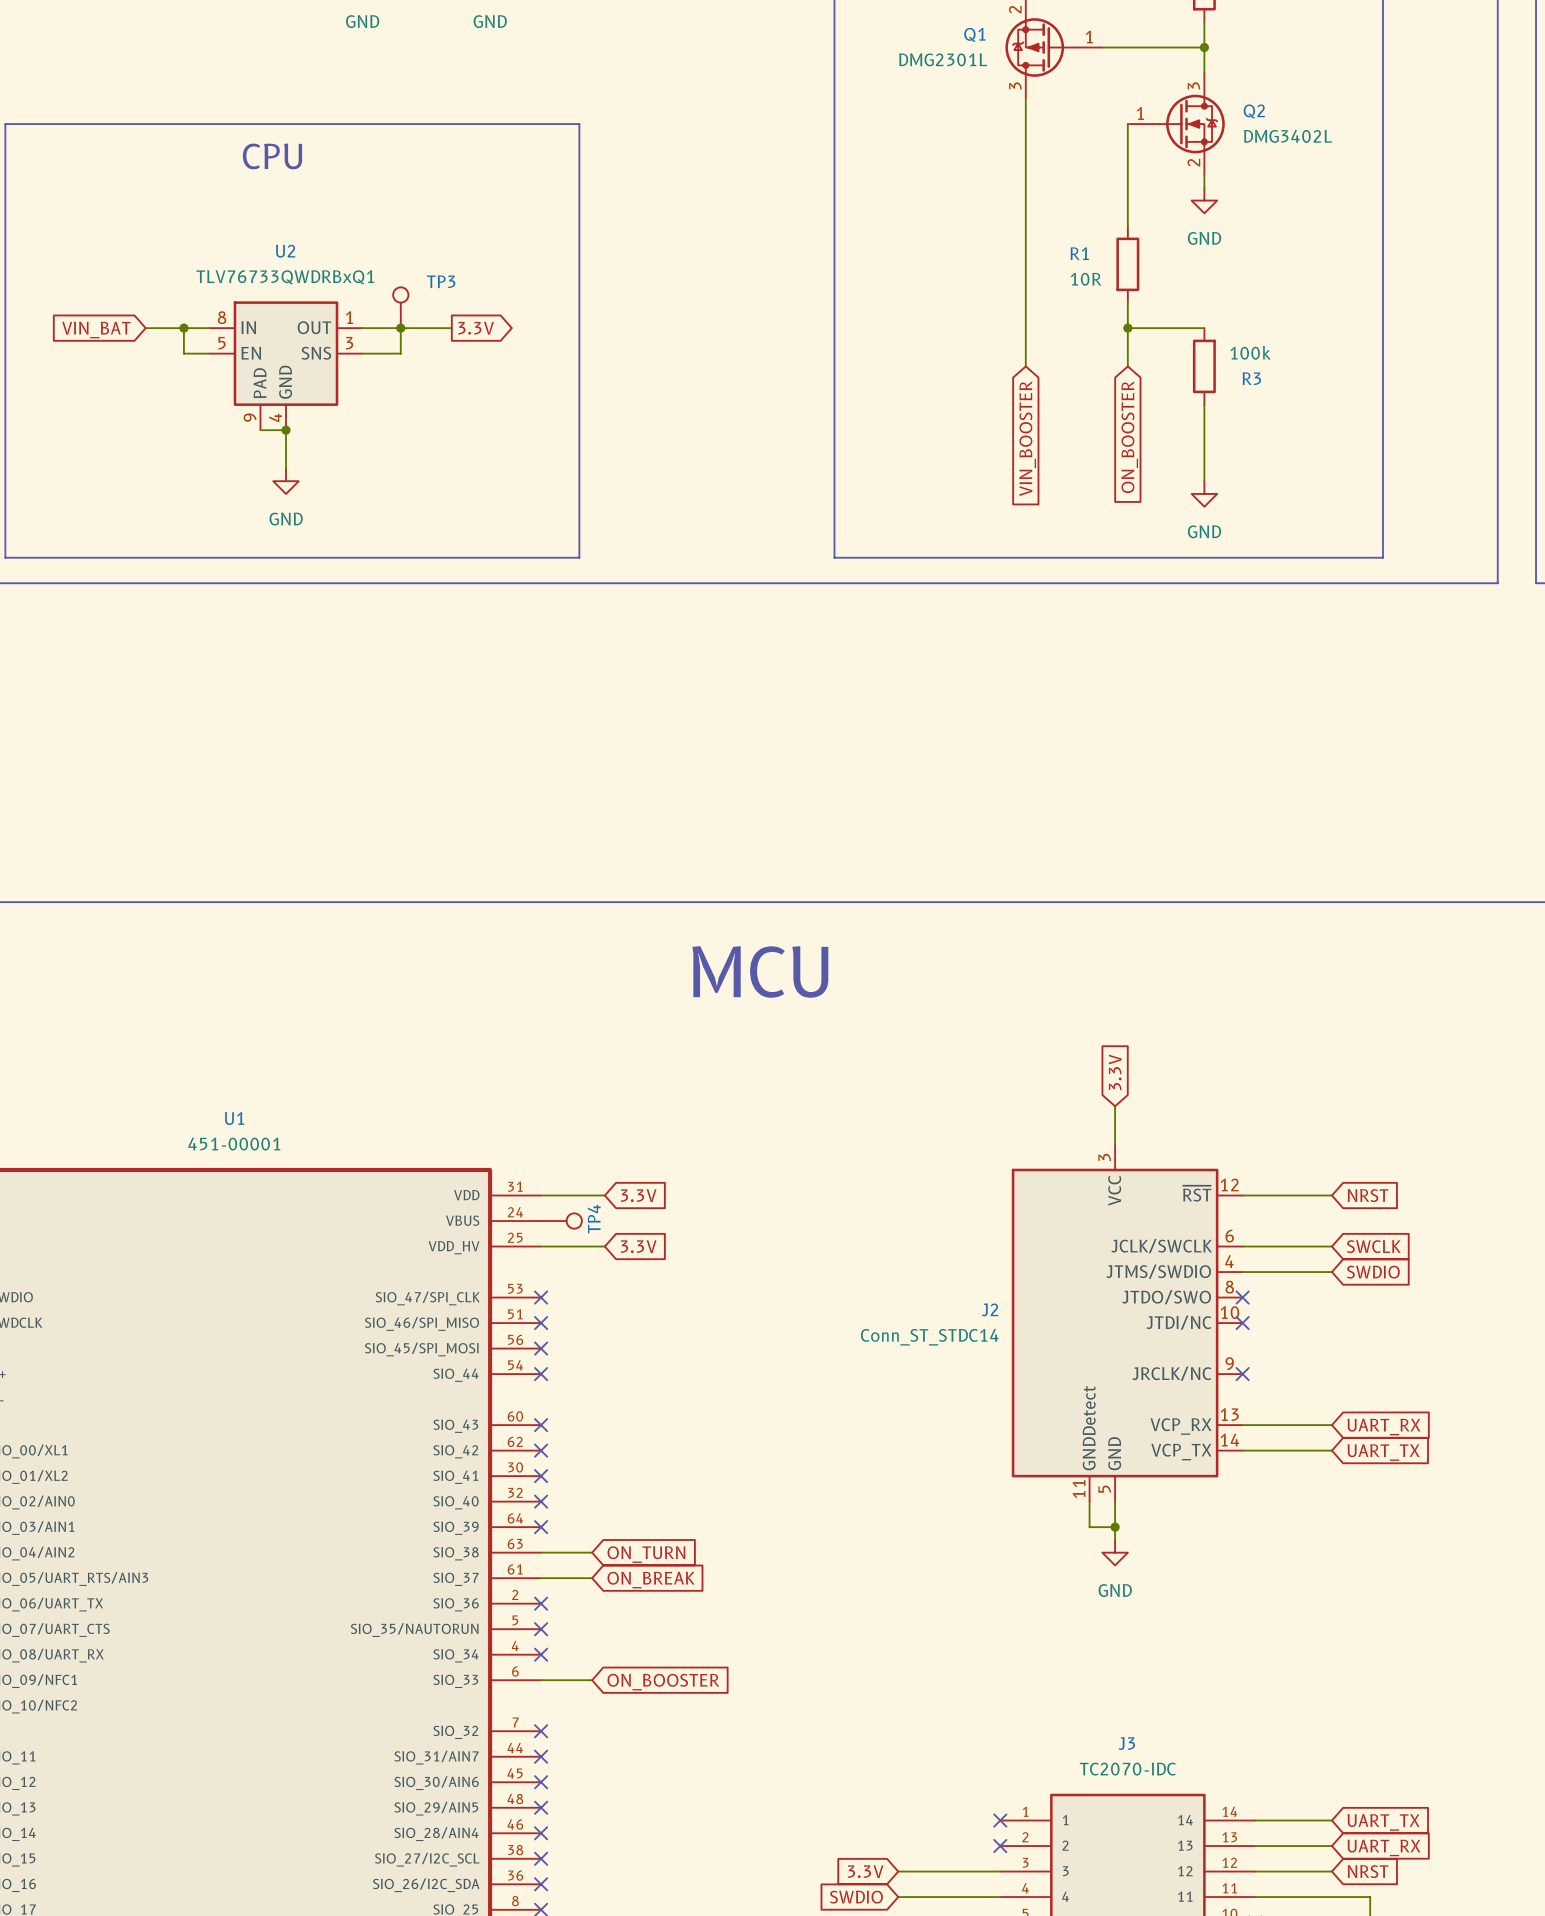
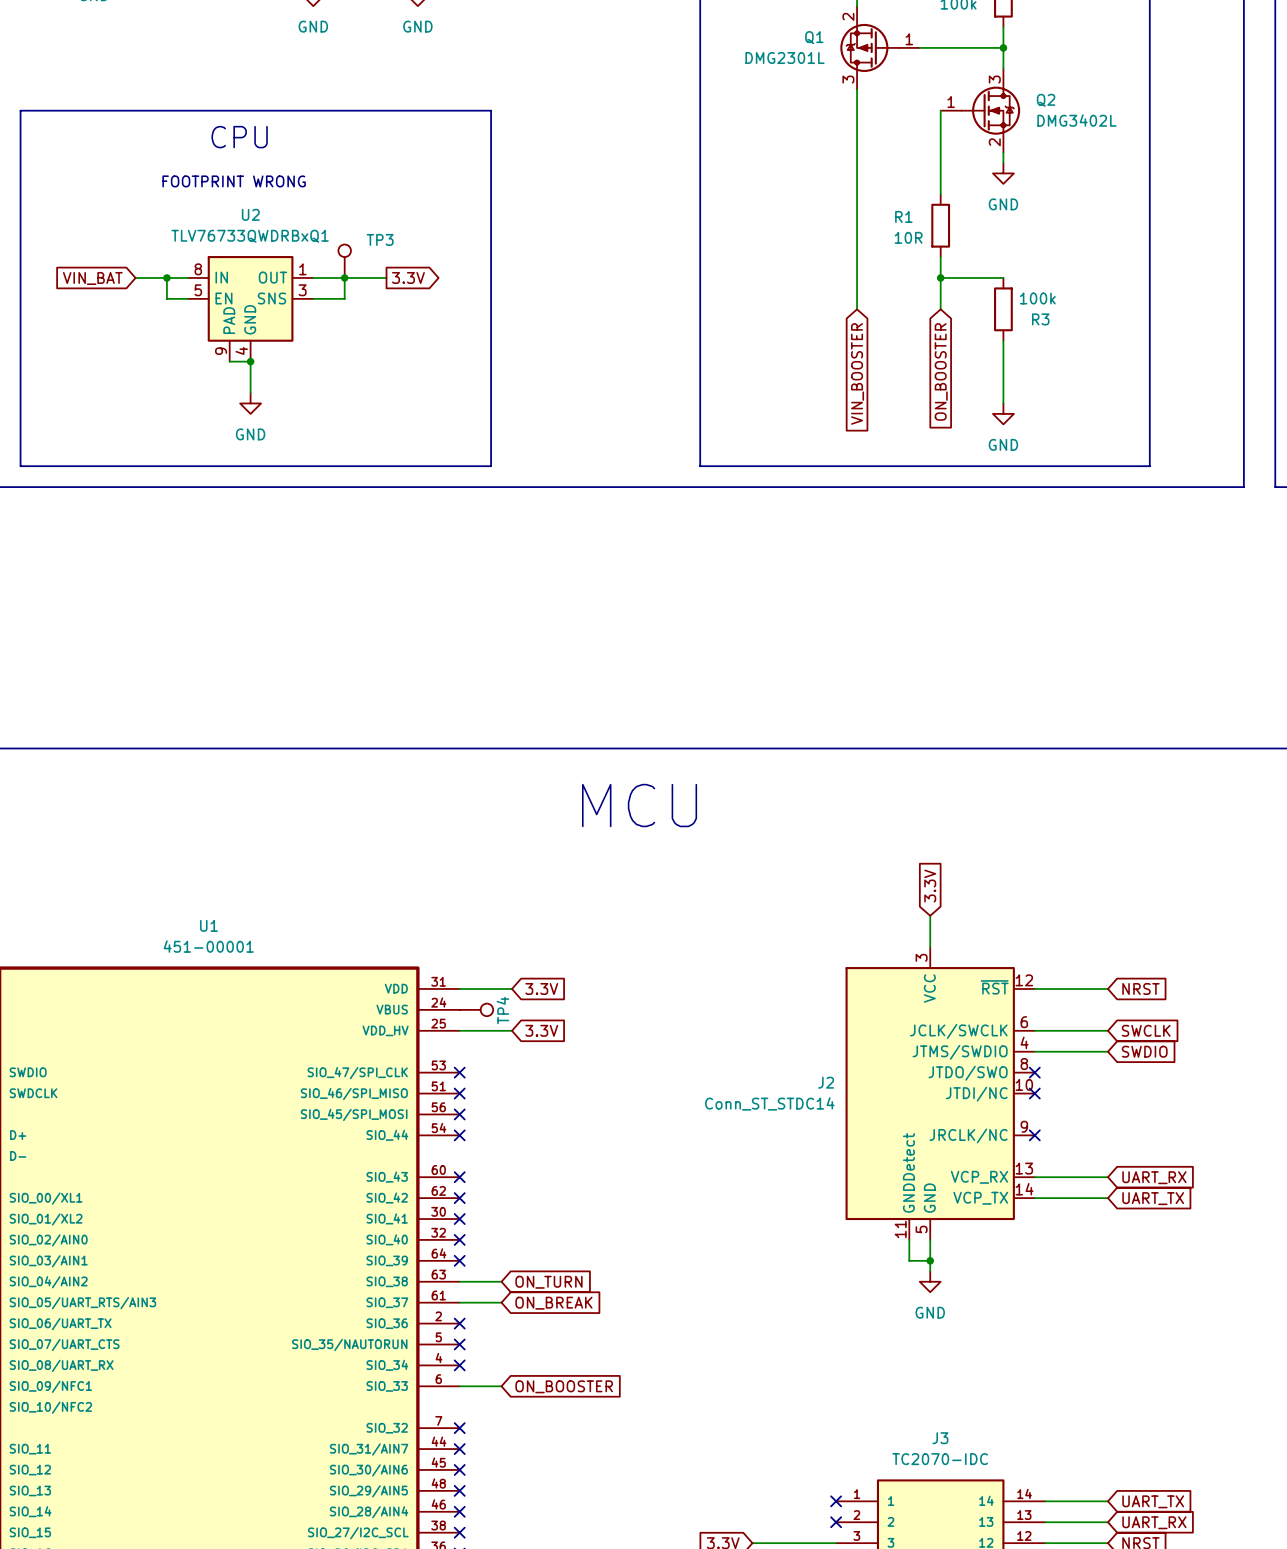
text: none -> FOOTPRINT WRONG (234, 181)

